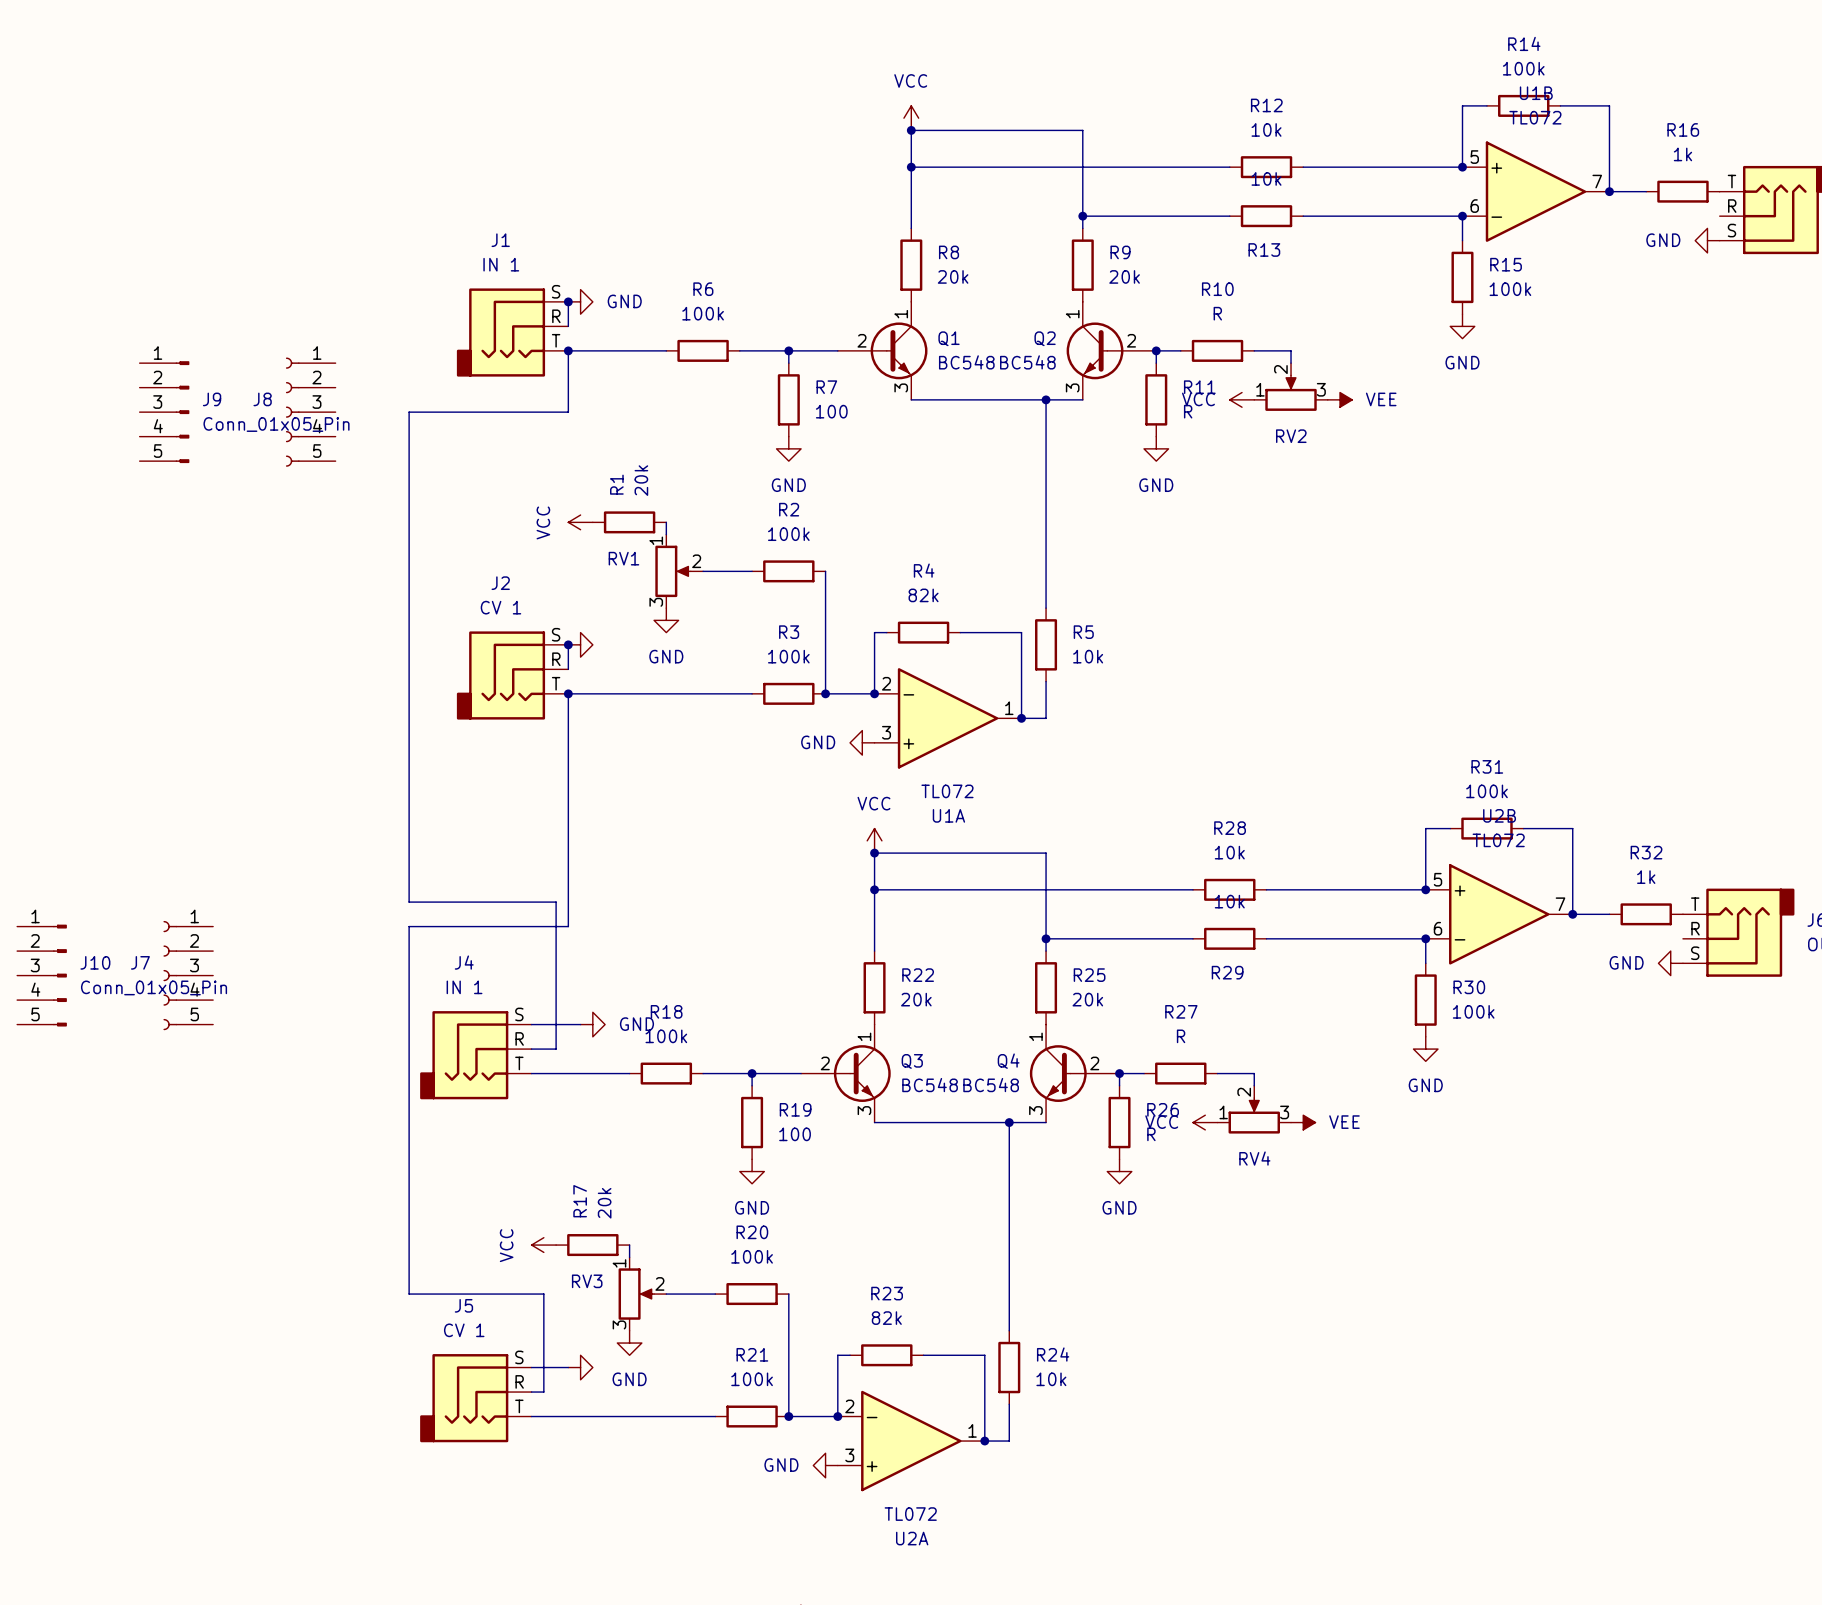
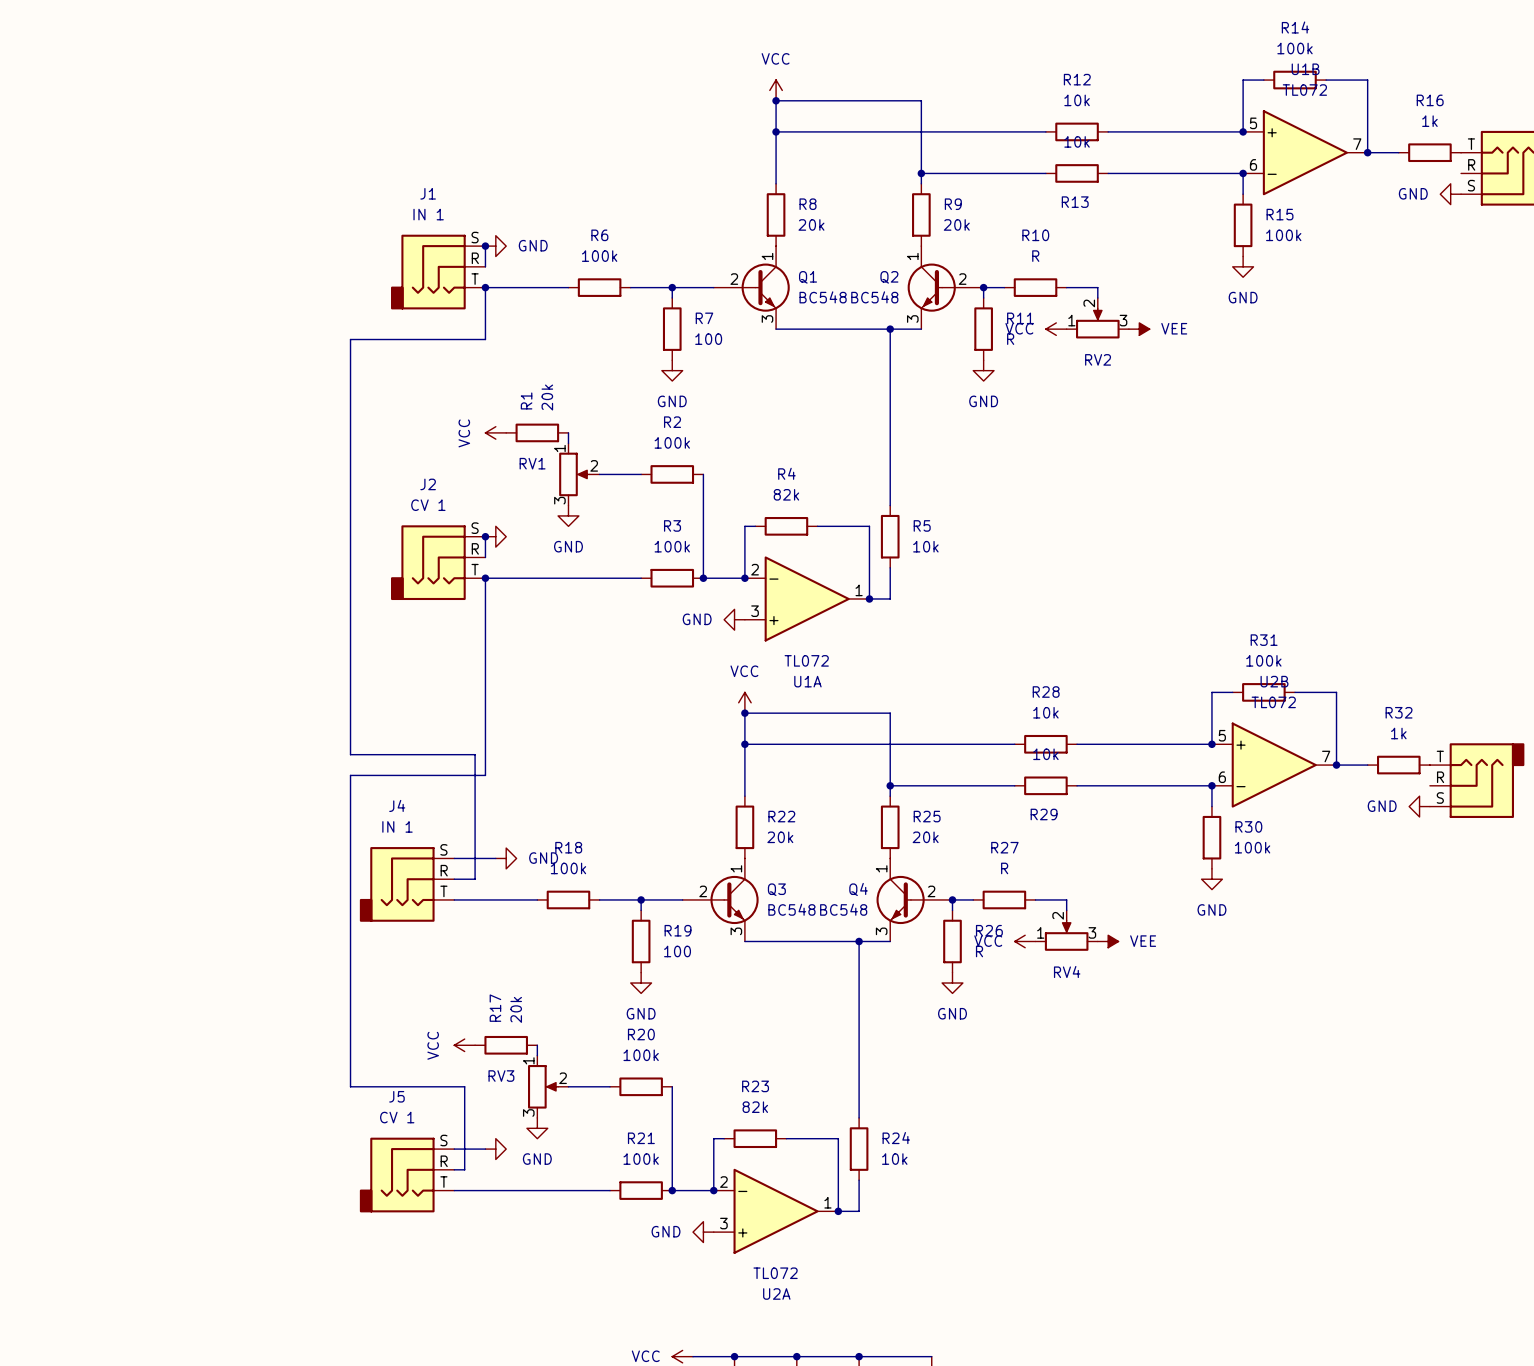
J9: Conn_01x05_Pin (164, 412) -> none
J8: (310, 412) -> none
J10: Conn_01x05_Pin (42, 975) -> none
J7: (188, 975) -> none

